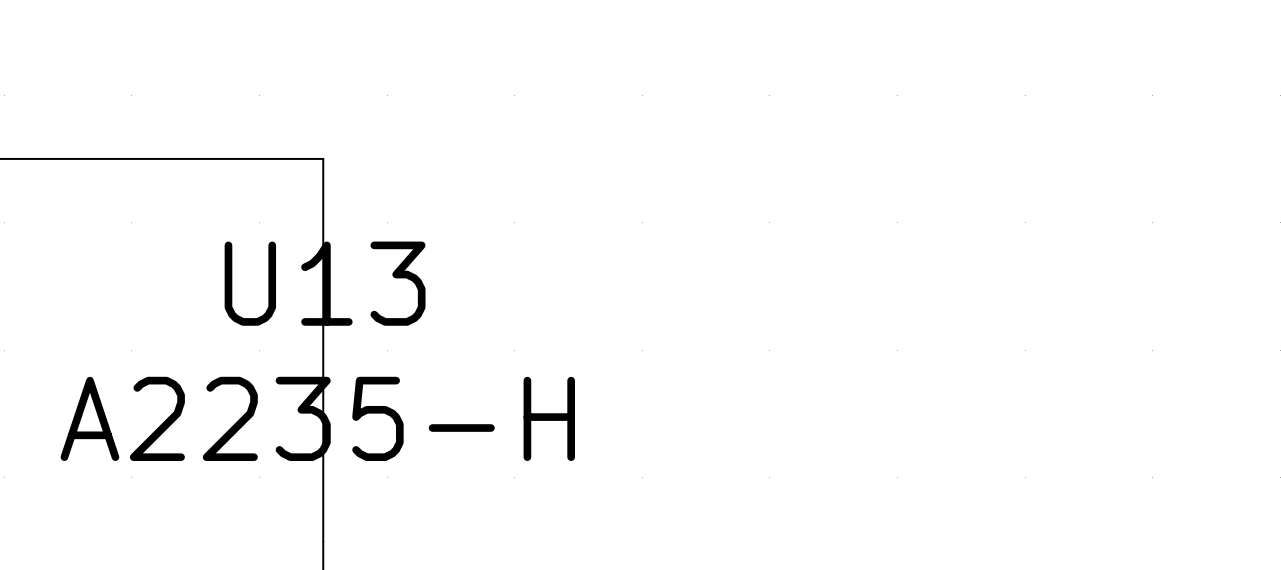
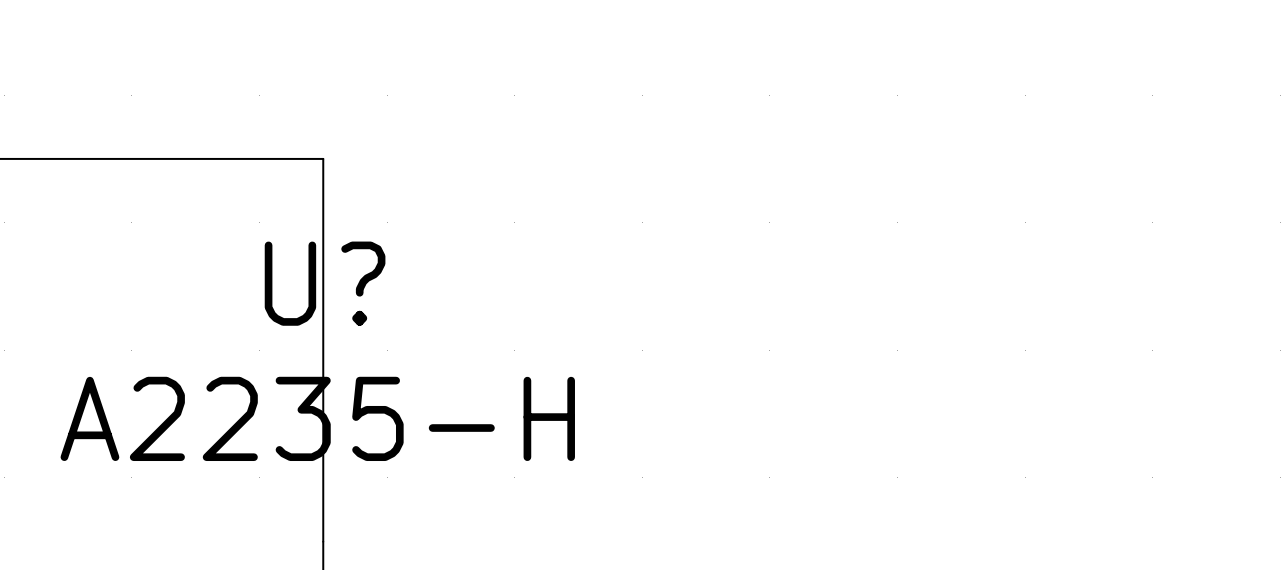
U13 name: U13 (325, 283) -> U? (325, 283)

